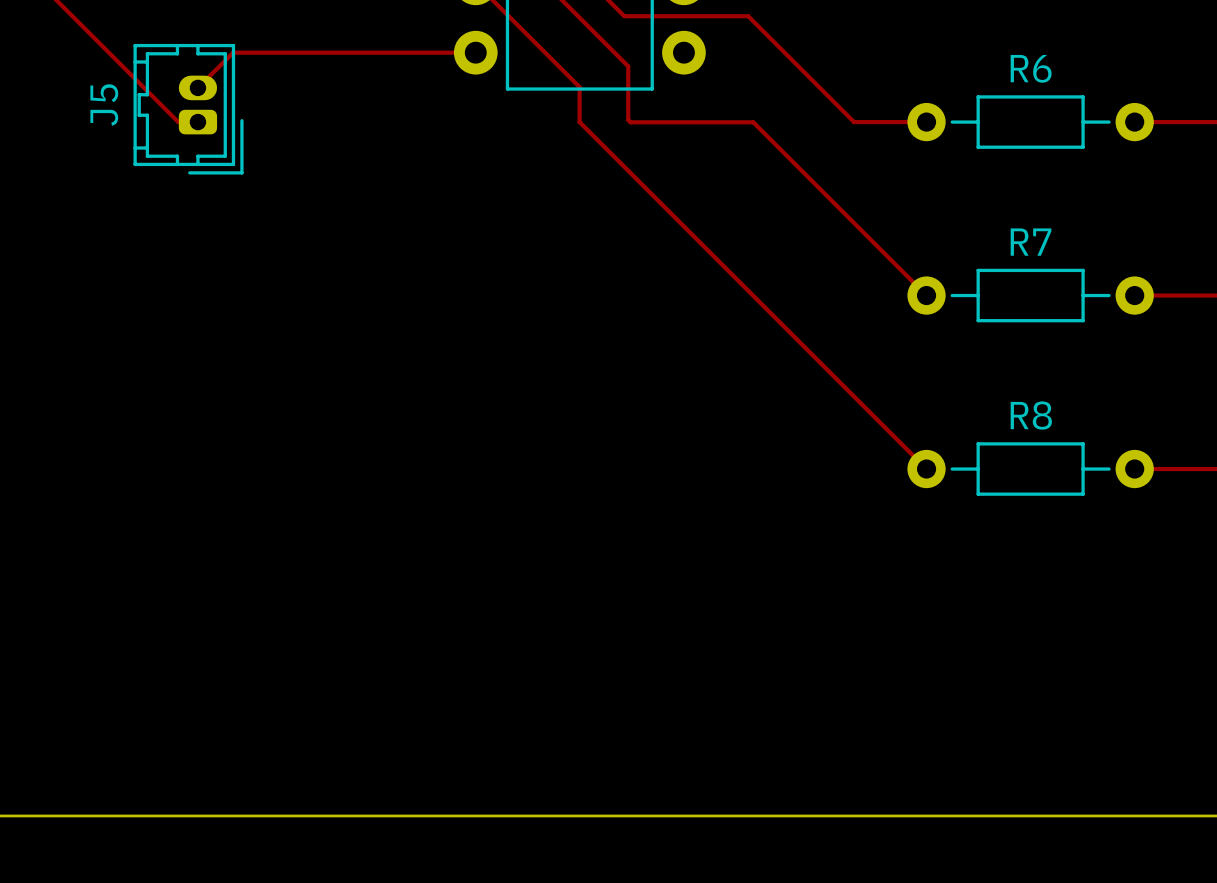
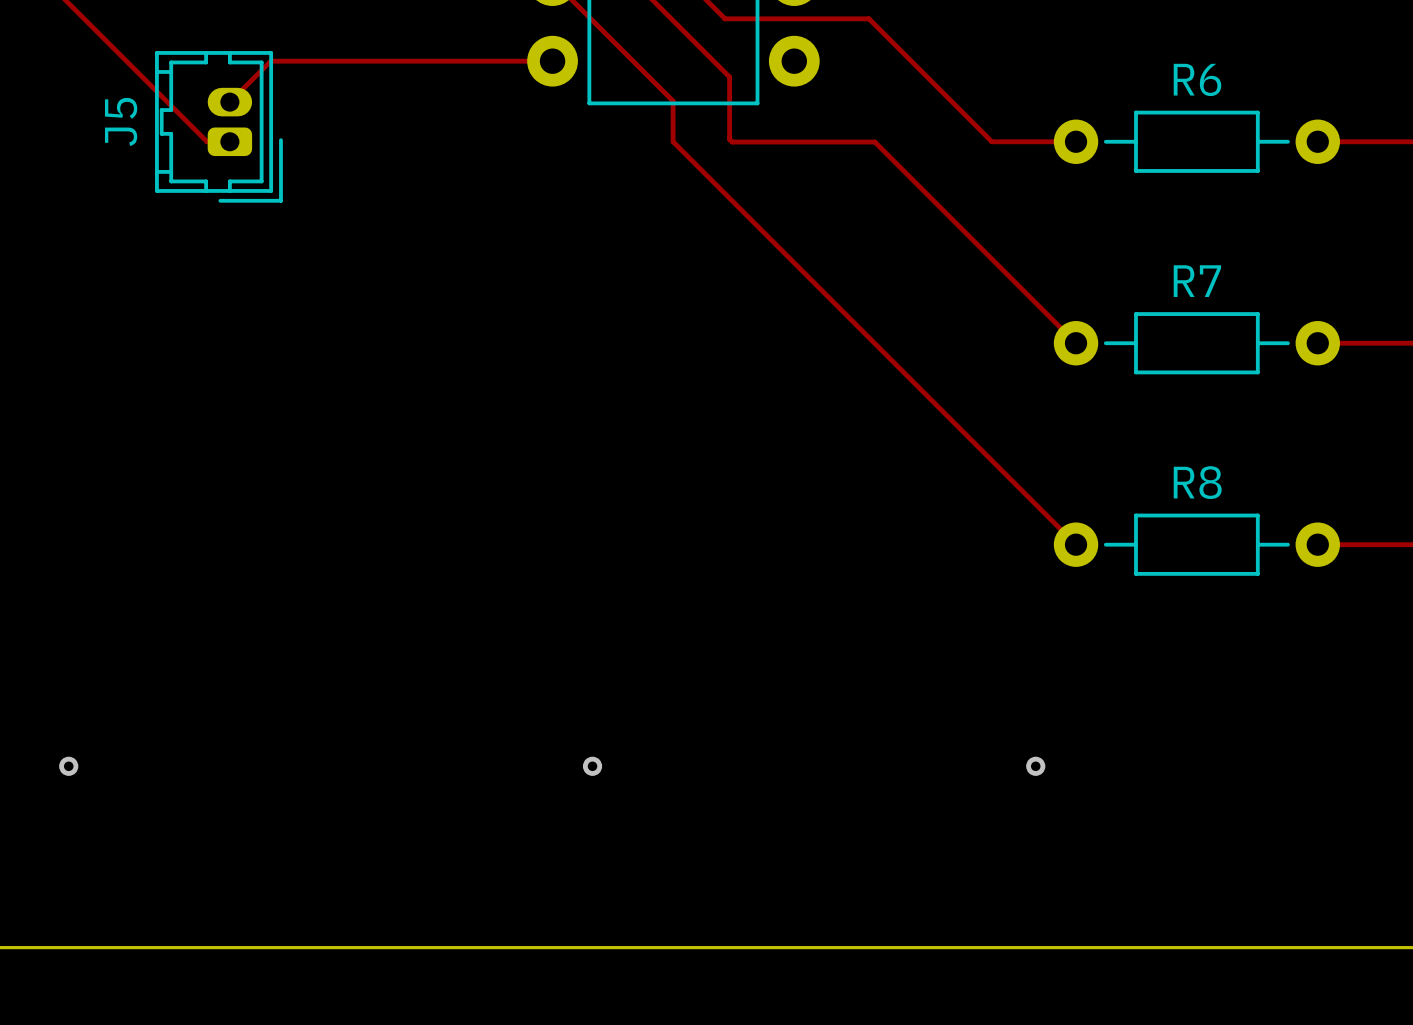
via: none -> (68, 766)
via: none -> (592, 766)
via: none -> (1035, 766)

